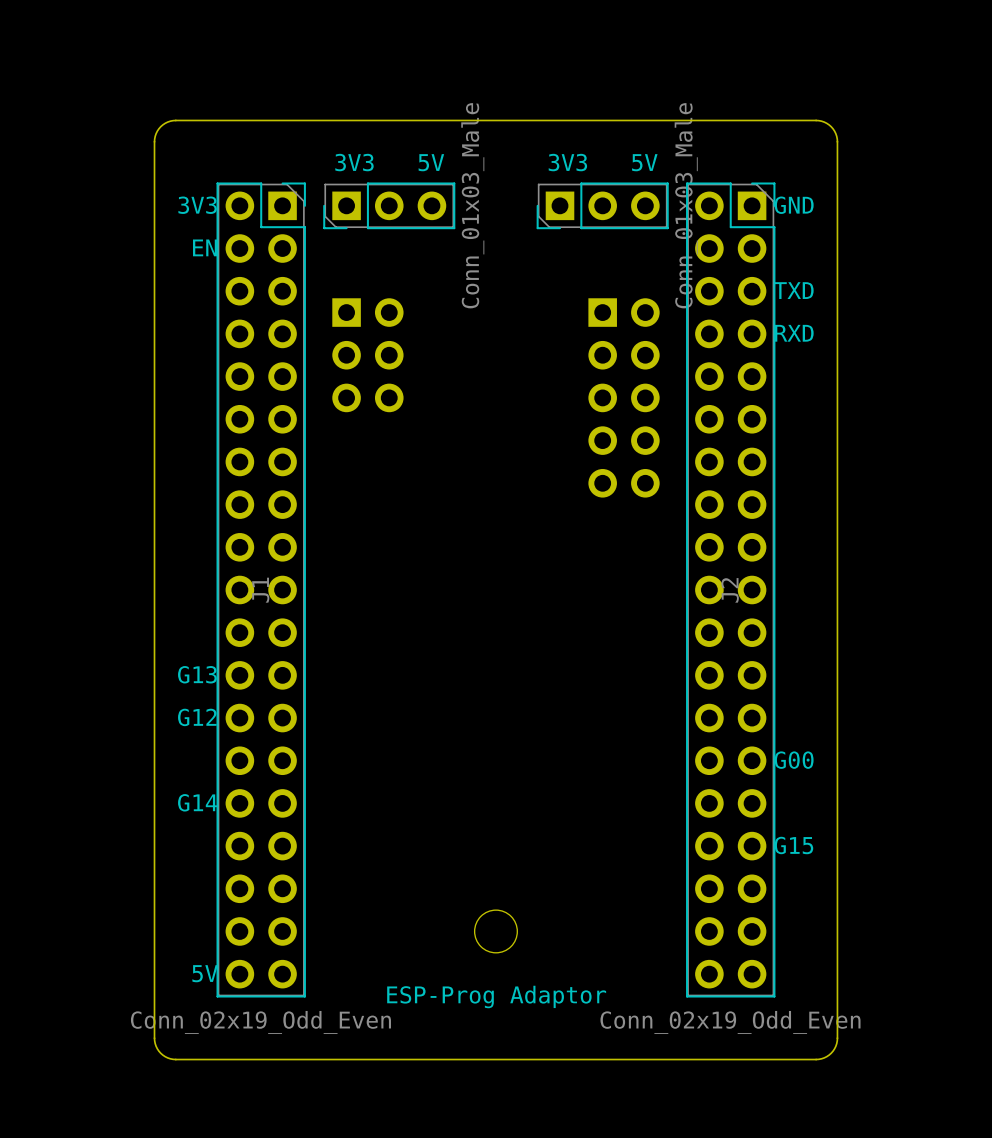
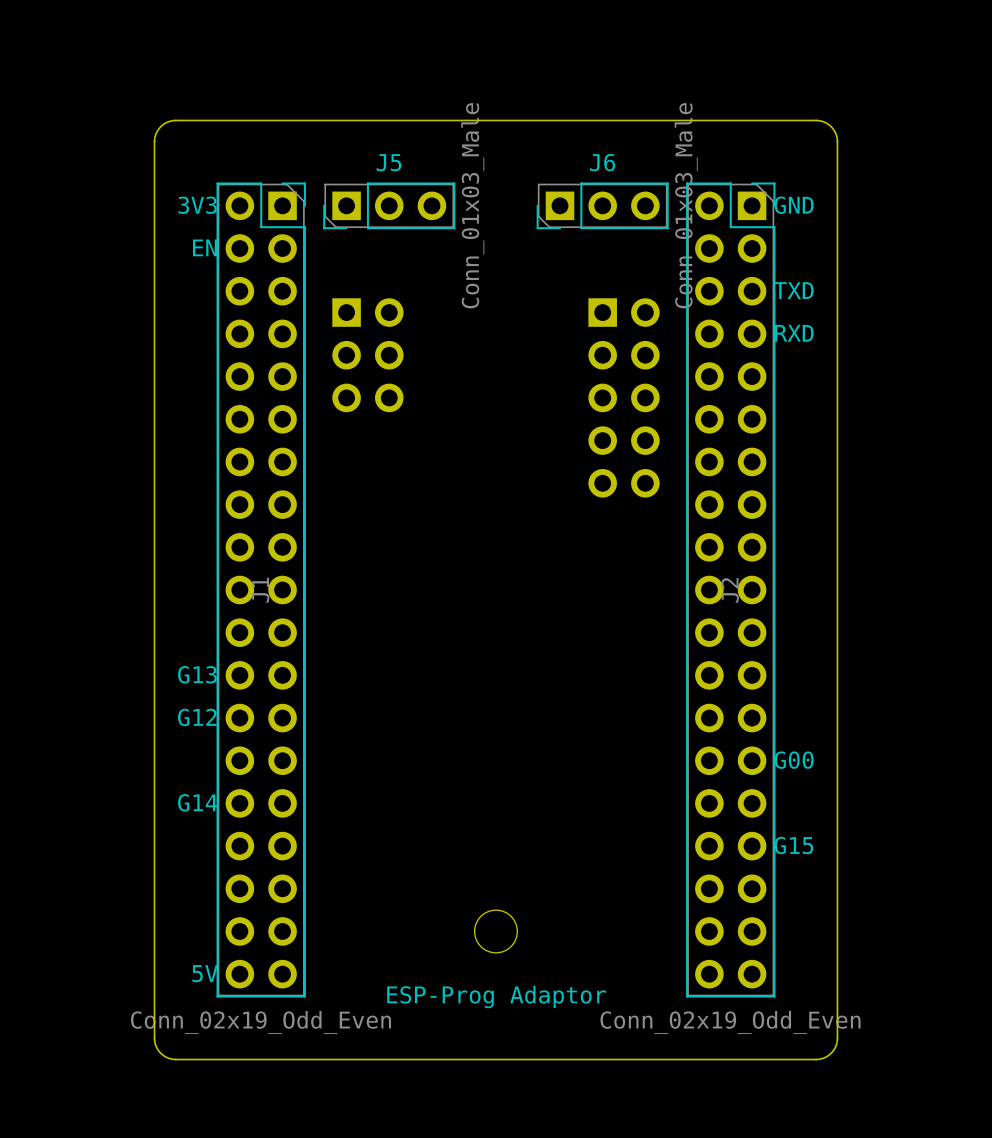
3V3 5V name: 3V3 5V (389, 162) -> J5 (388, 162)
3V3 5V name: 3V3 5V (603, 162) -> J6 (602, 162)

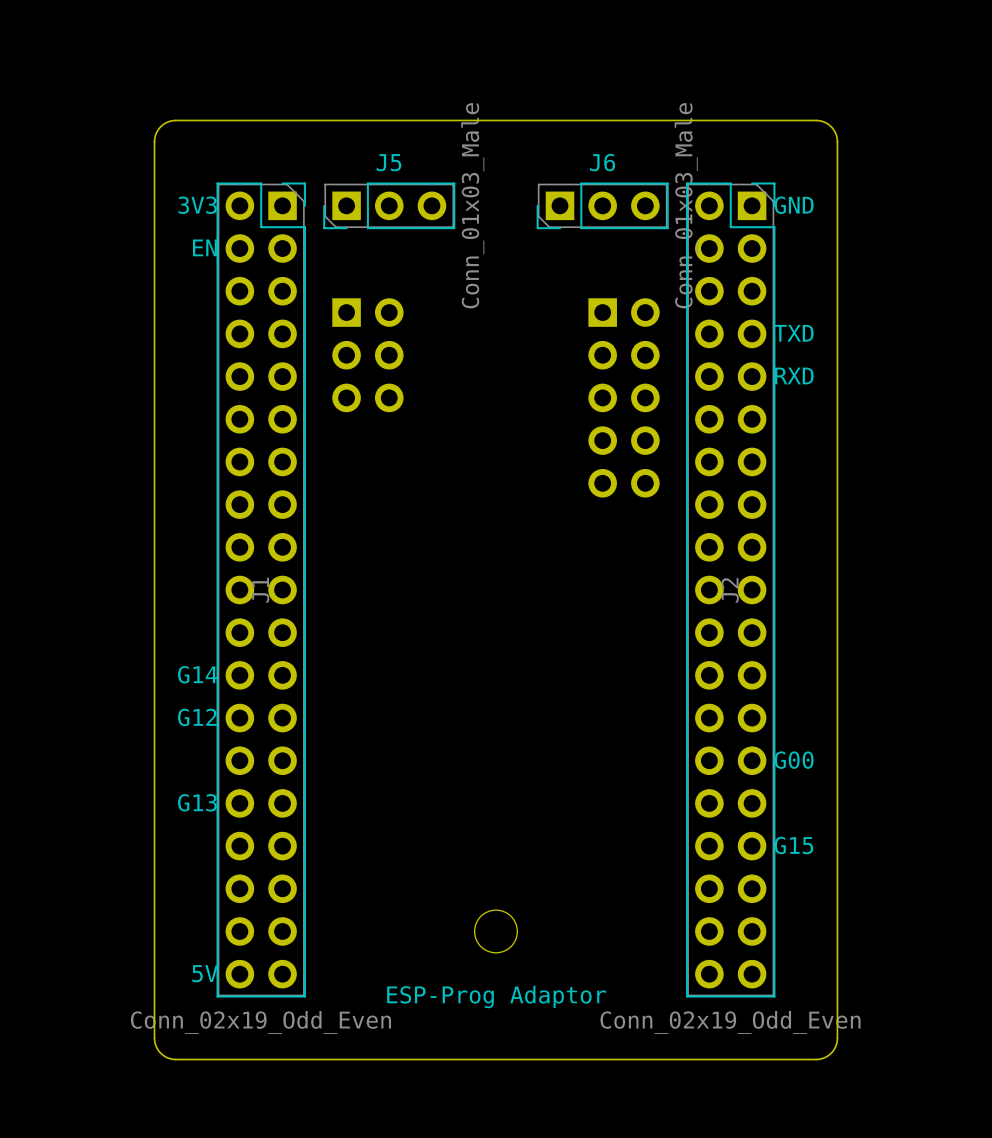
text: TXD (793, 290) -> none
text: RXD (794, 333) -> TXD (793, 333)
text: none -> RXD (794, 375)
text: G13 (197, 674) -> G14 (197, 674)
text: G14 (197, 802) -> G13 (197, 802)

